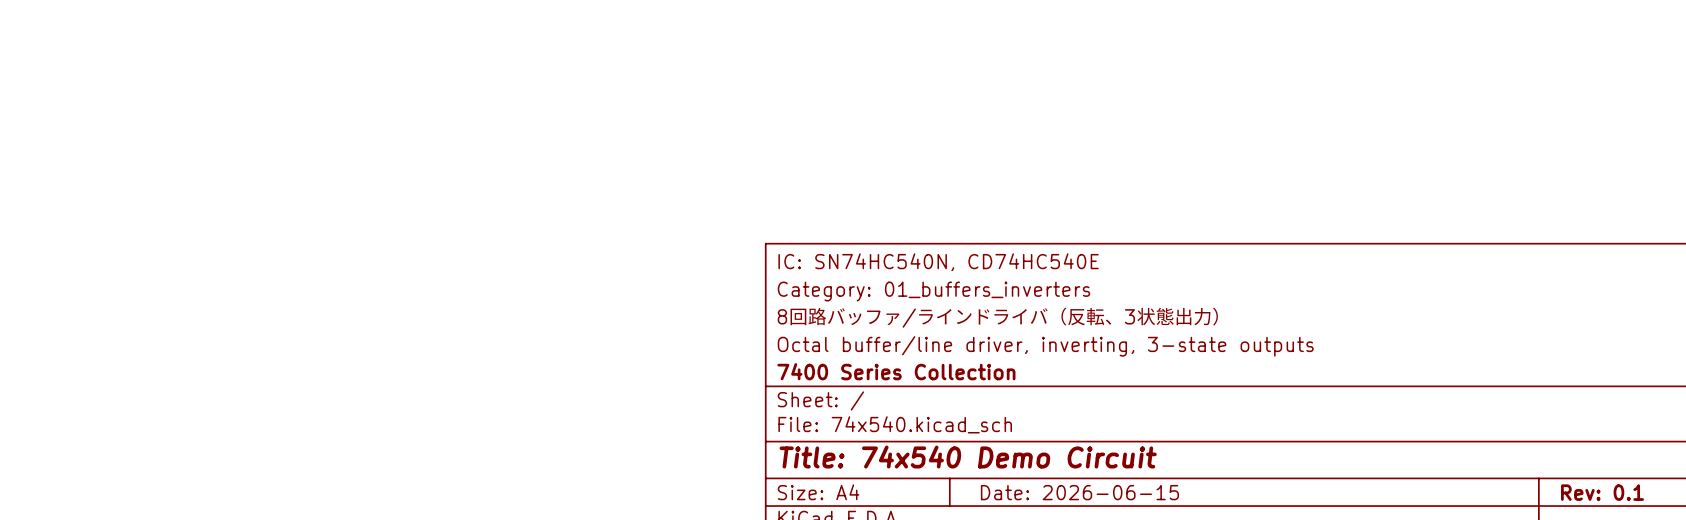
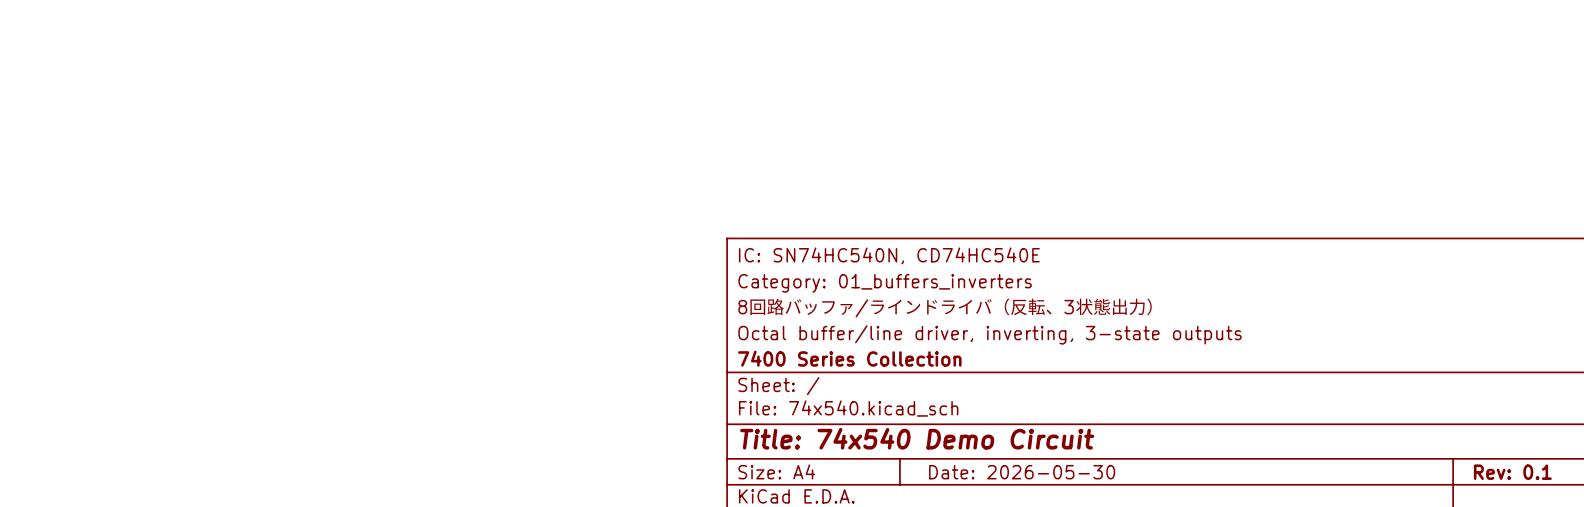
title block: Date: 2026-06-15 (1079, 492) -> Date: 2026-05-30 (1022, 472)

